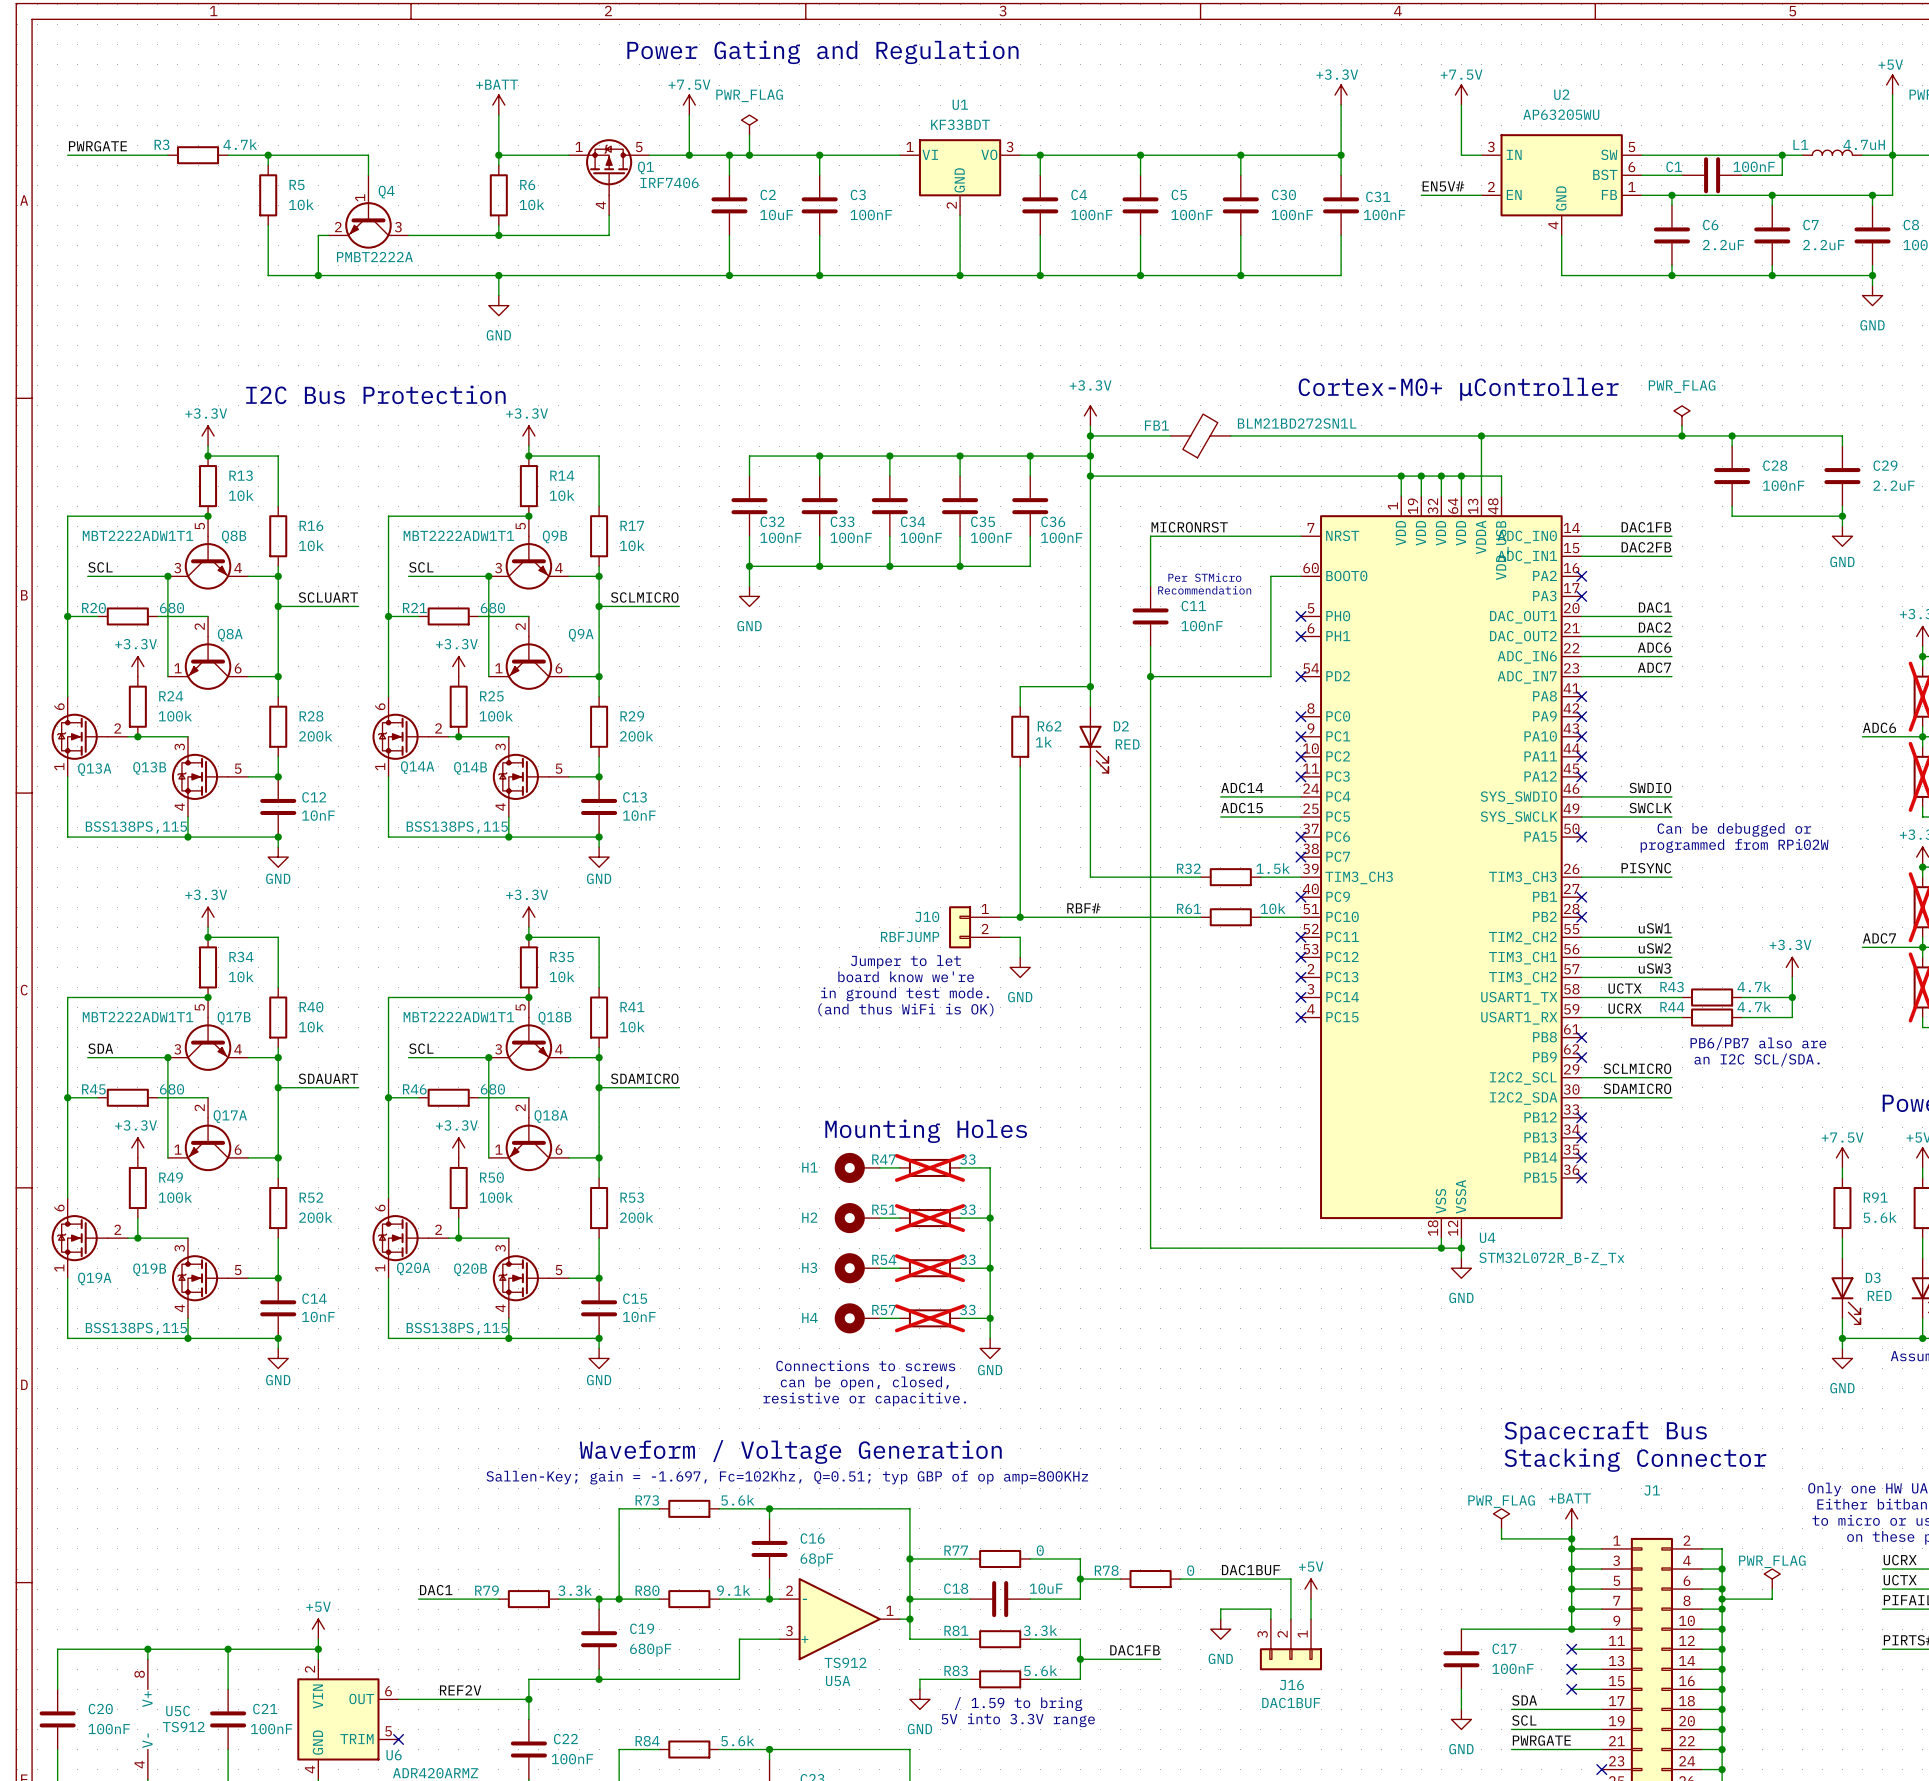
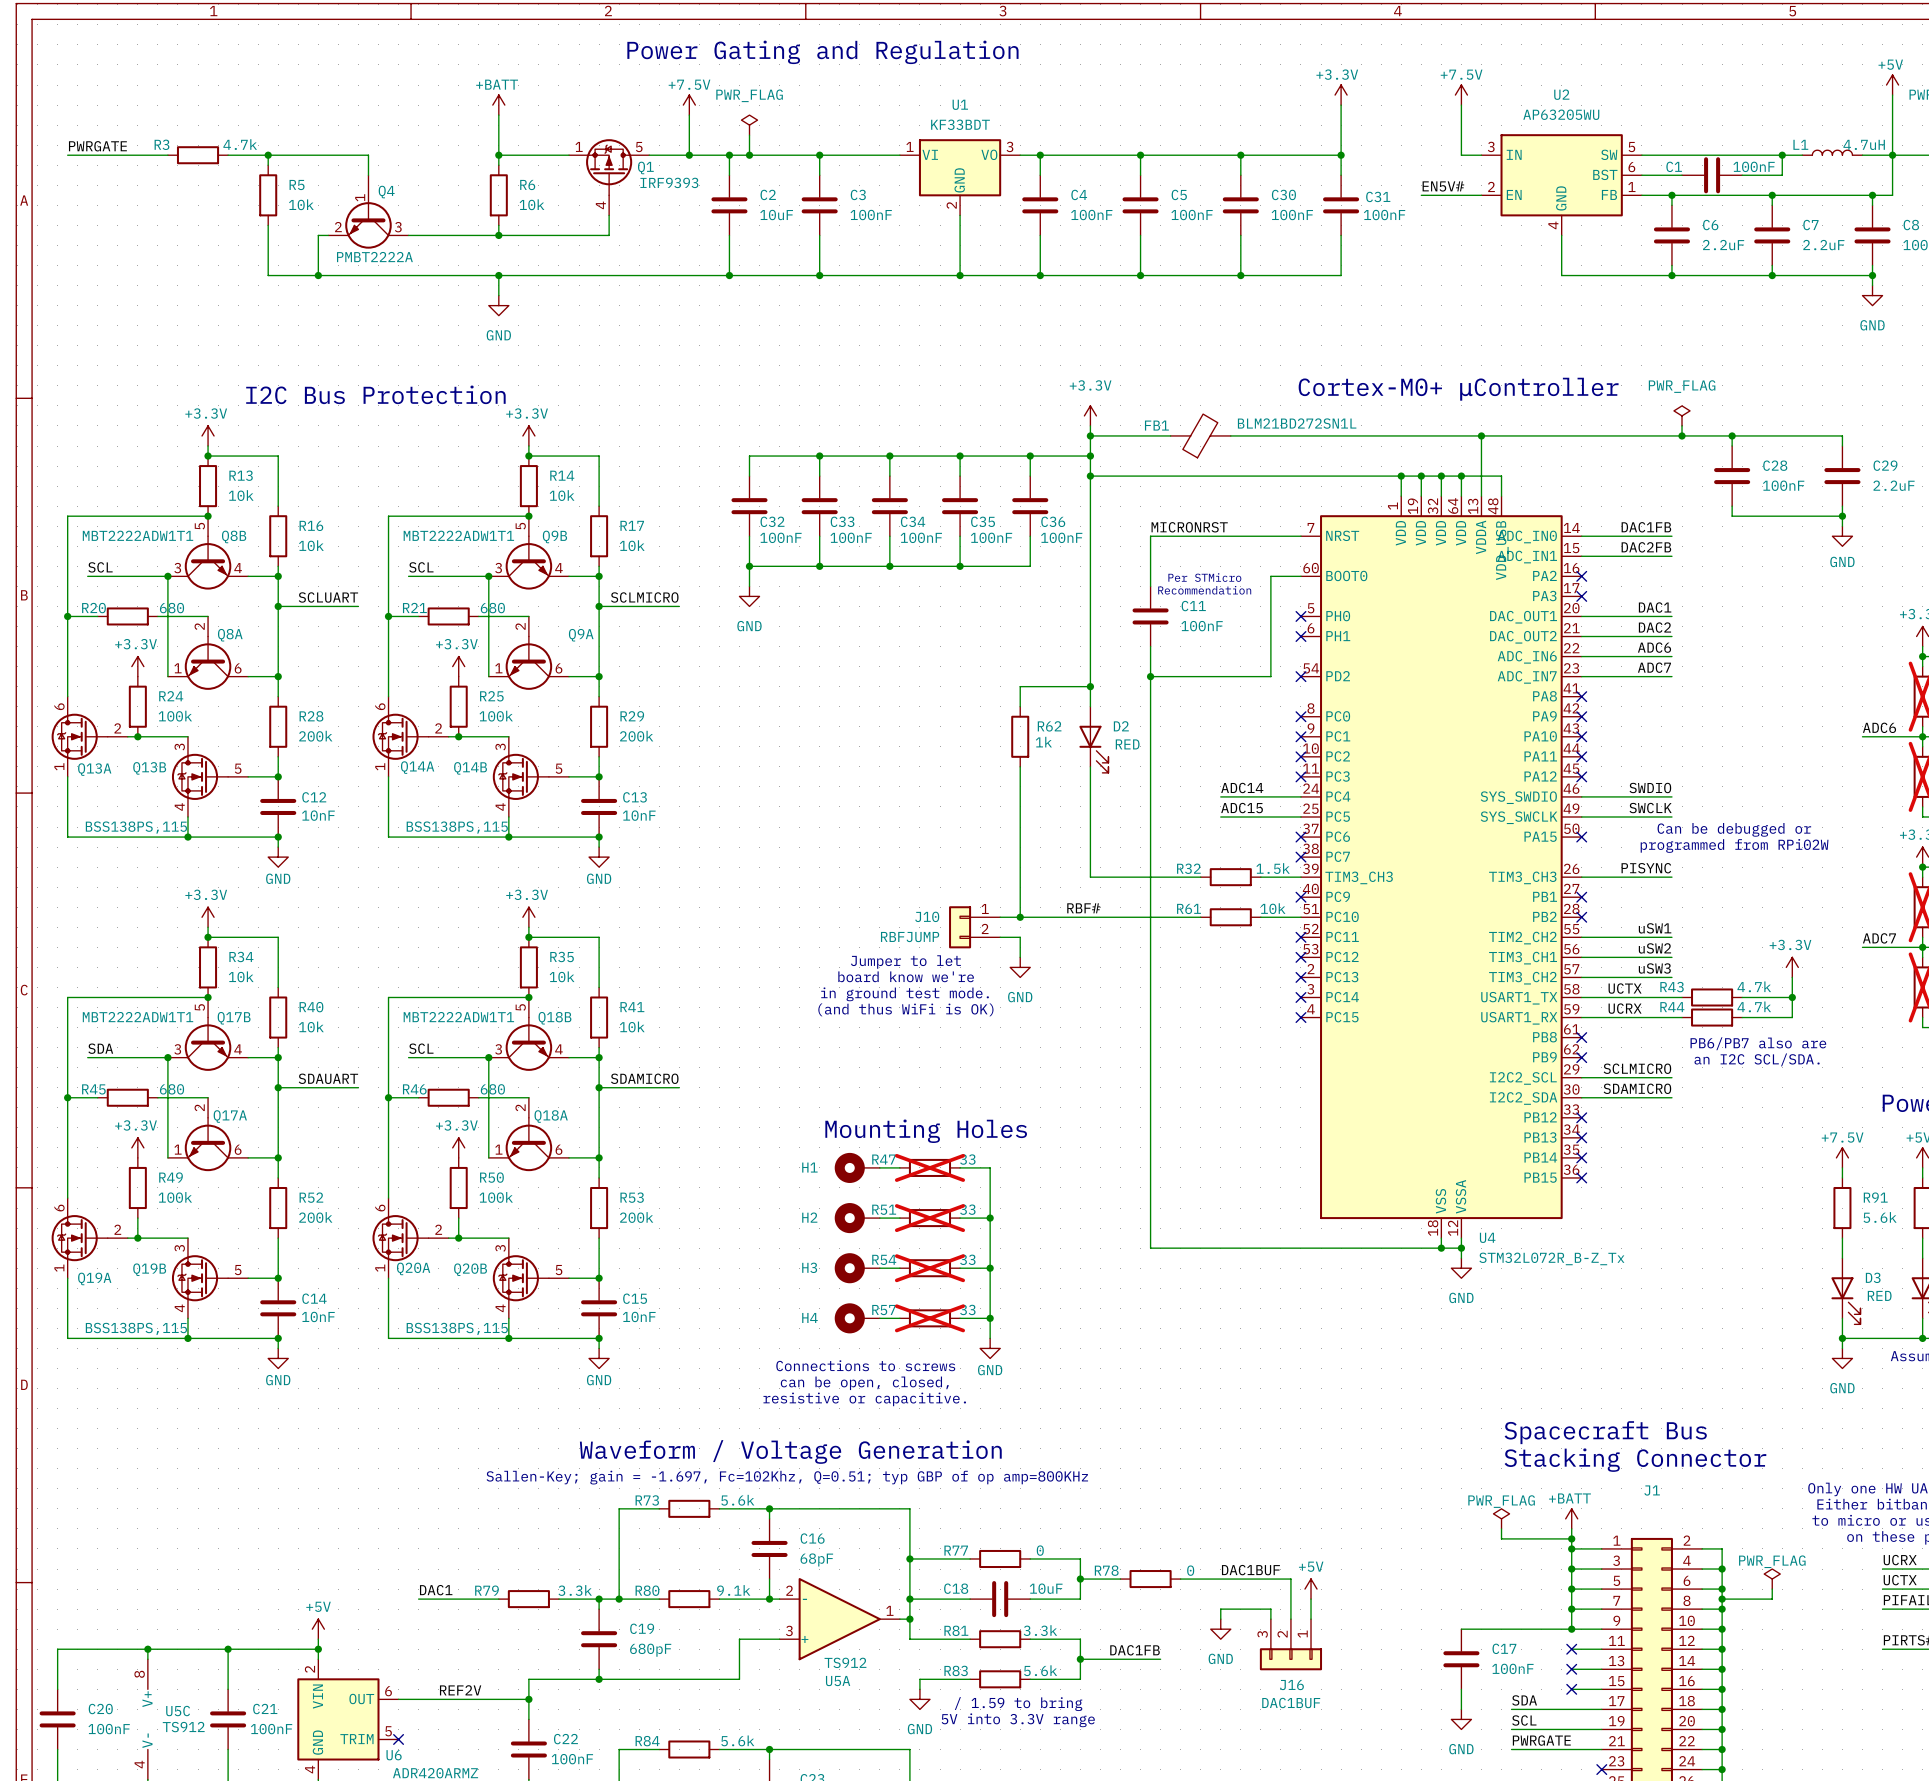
Q1 value: IRF7406 (669, 182) -> IRF9393 (669, 182)

